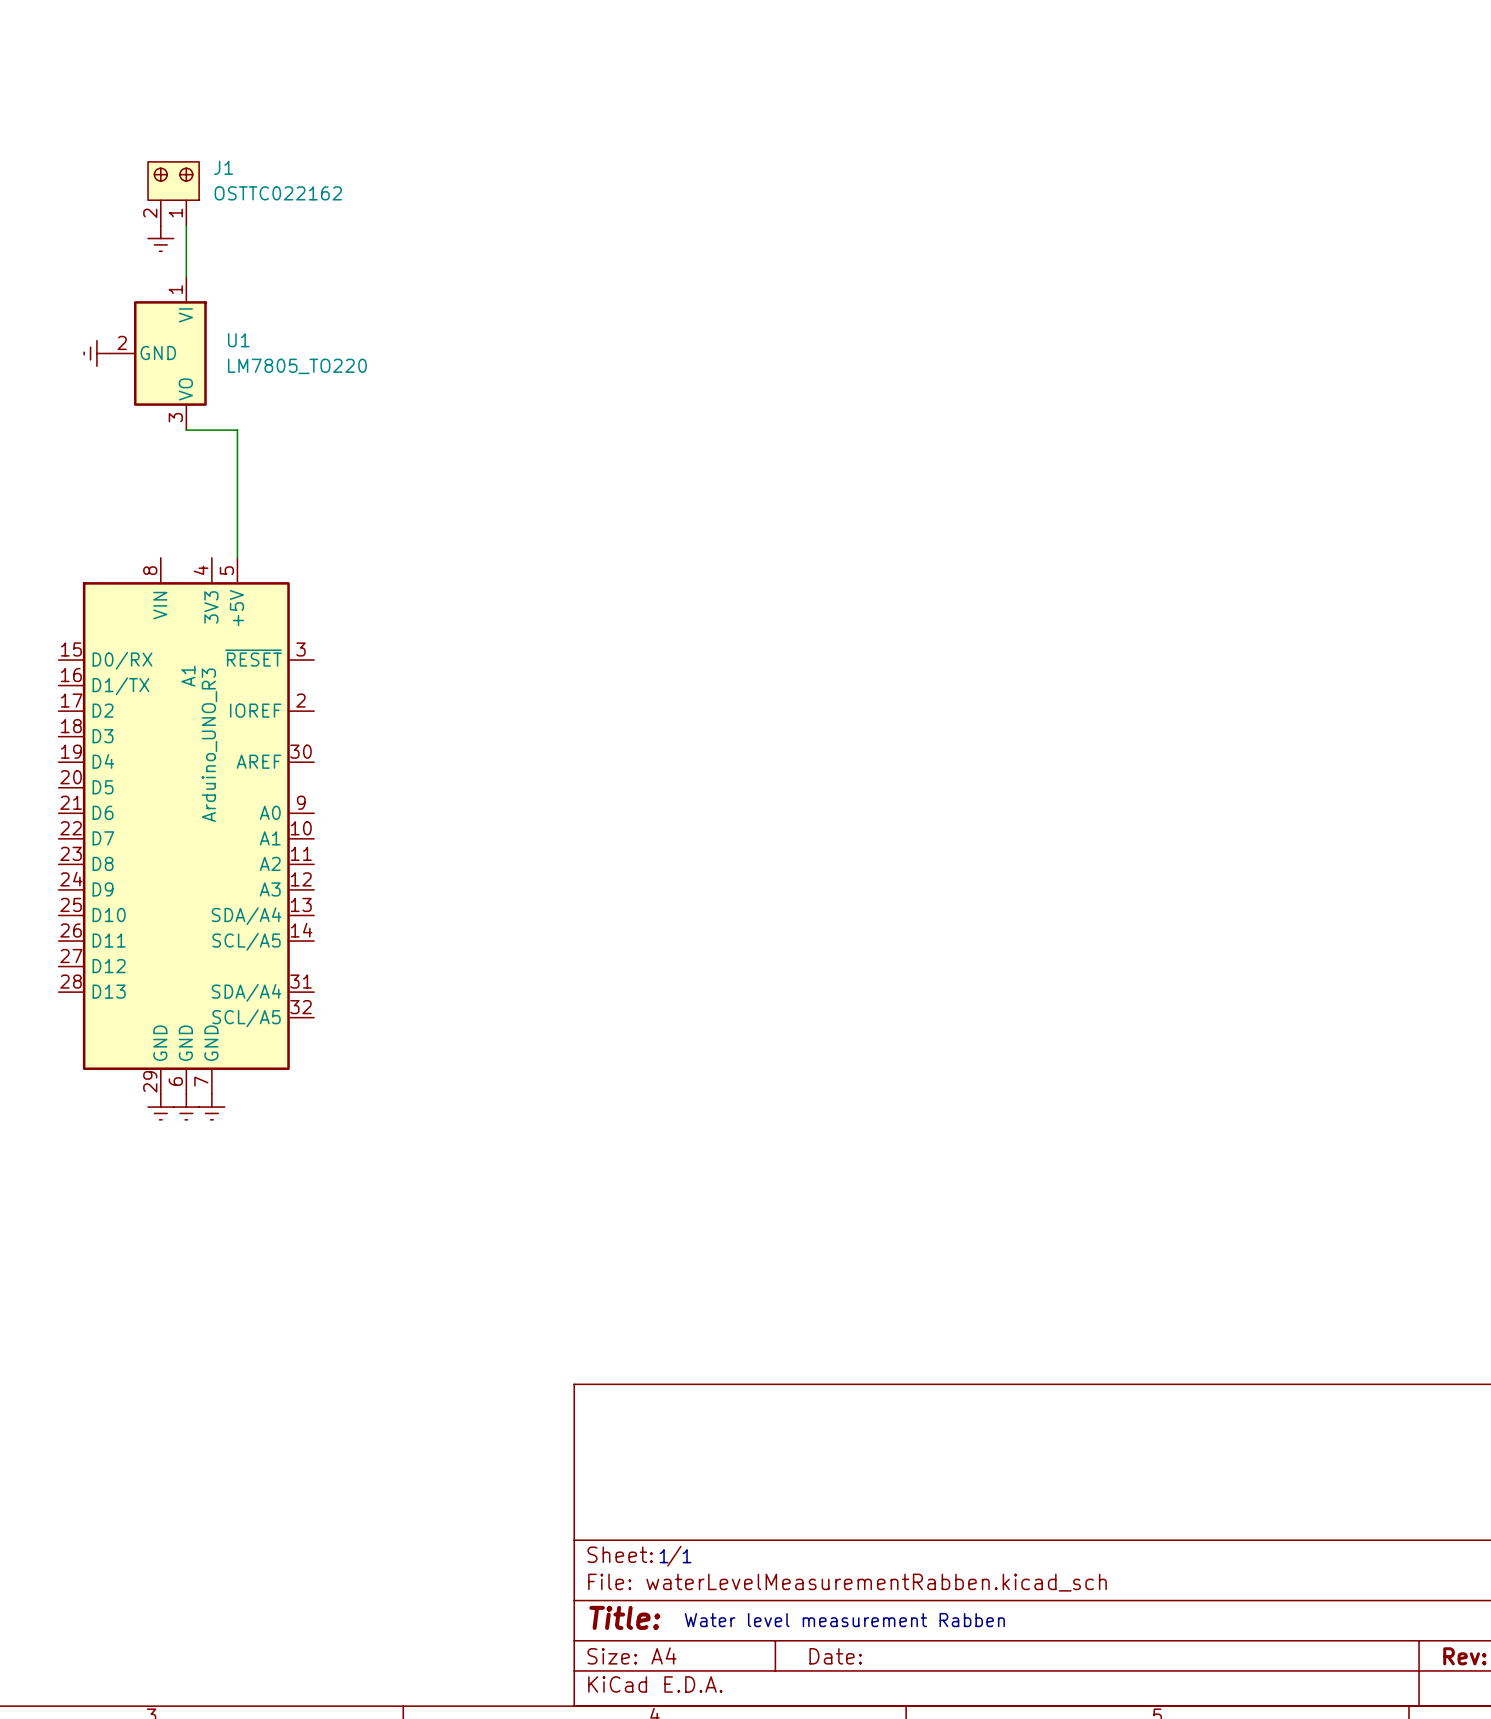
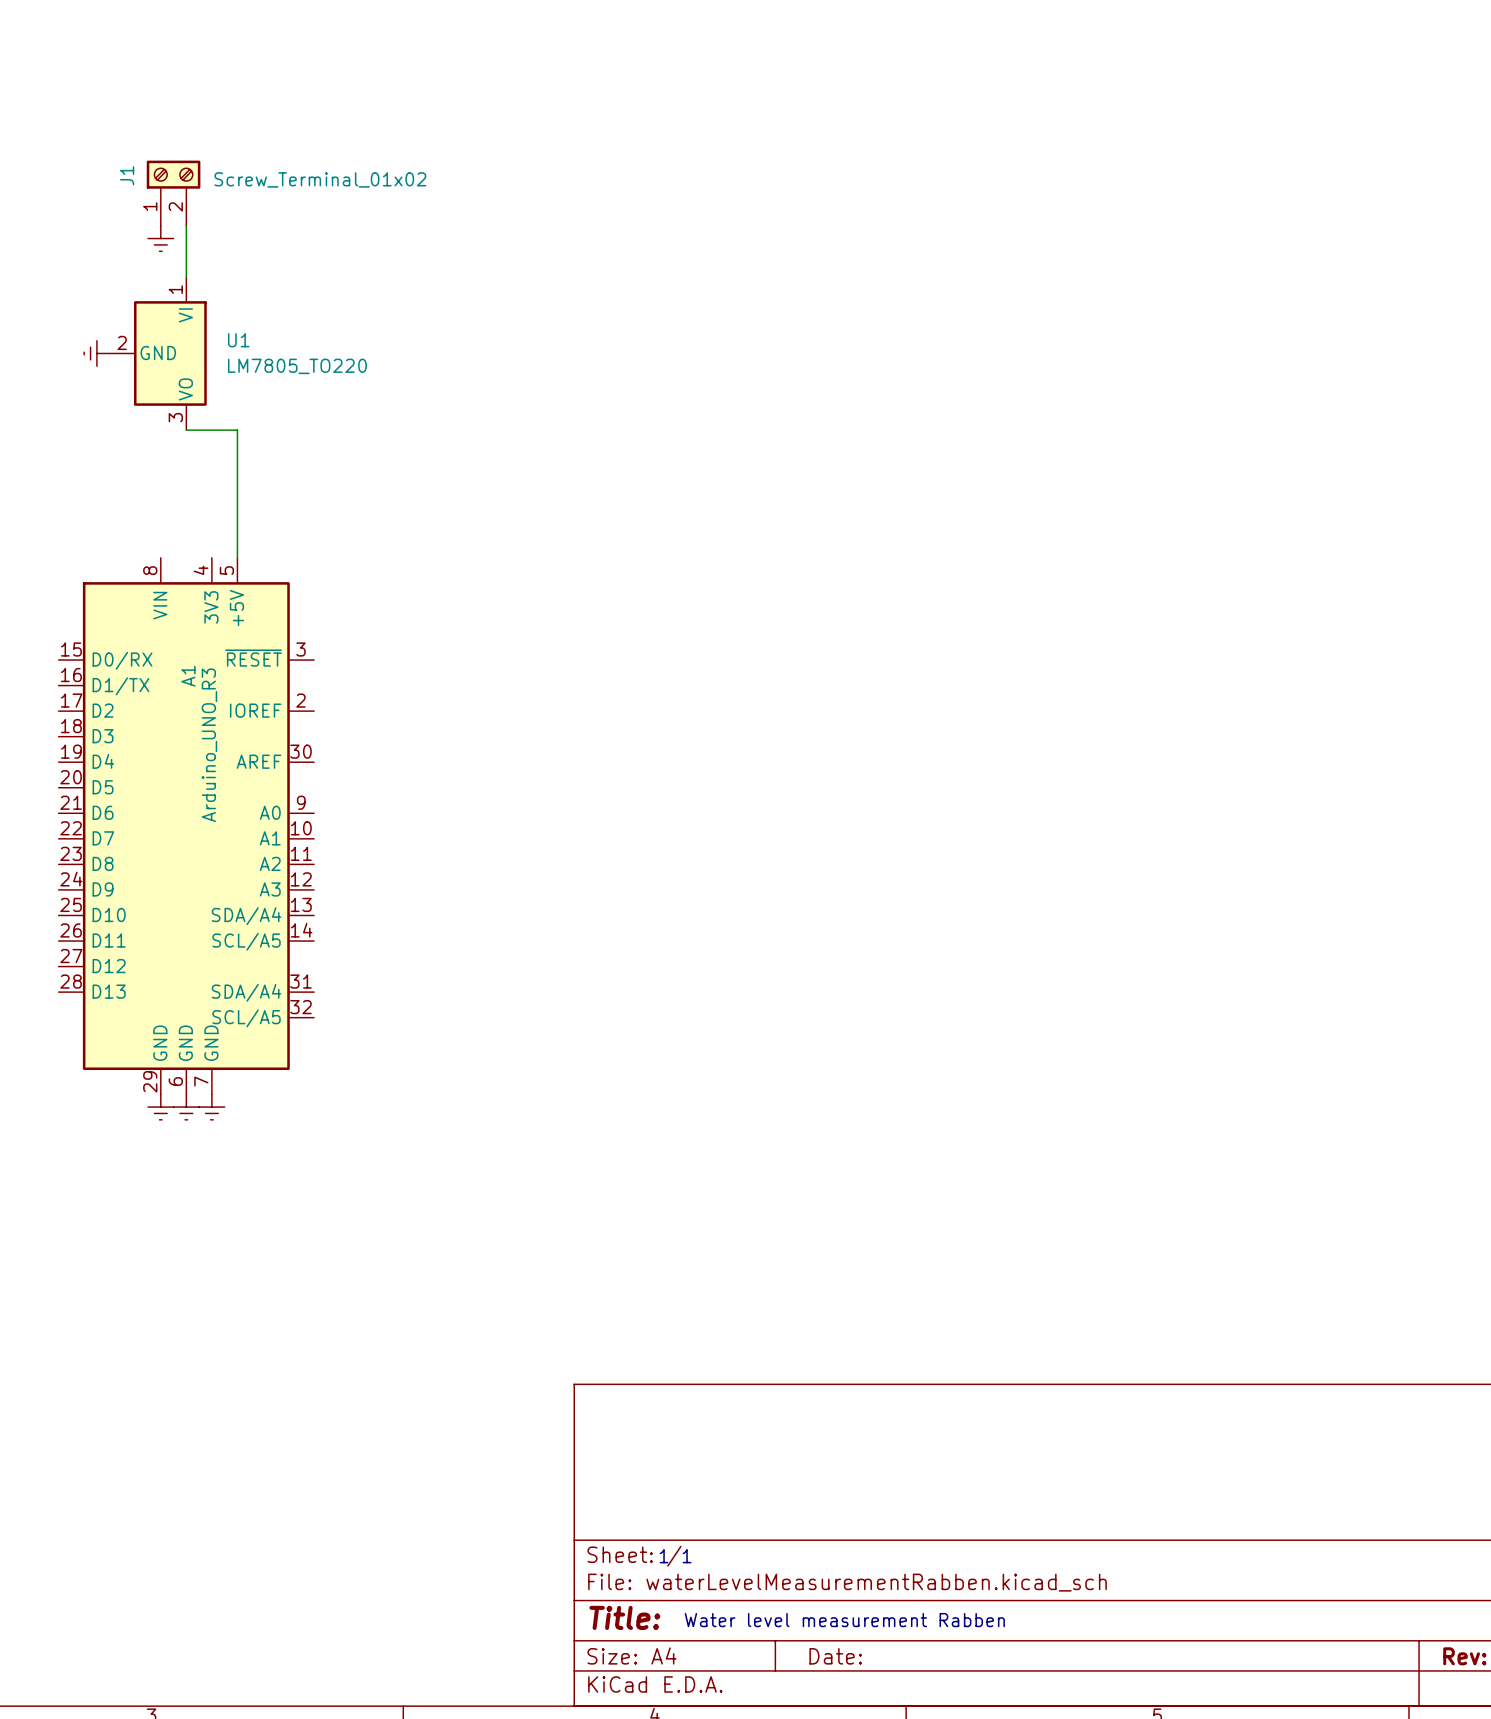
J1 symbol: [148, 161, 200, 226] -> [146, 160, 201, 226]
J1 name position: J1 (223, 167) -> J1 (127, 175)
J1 value: OSTTC022162 (278, 193) -> Screw_Terminal_01x02 (320, 179)

